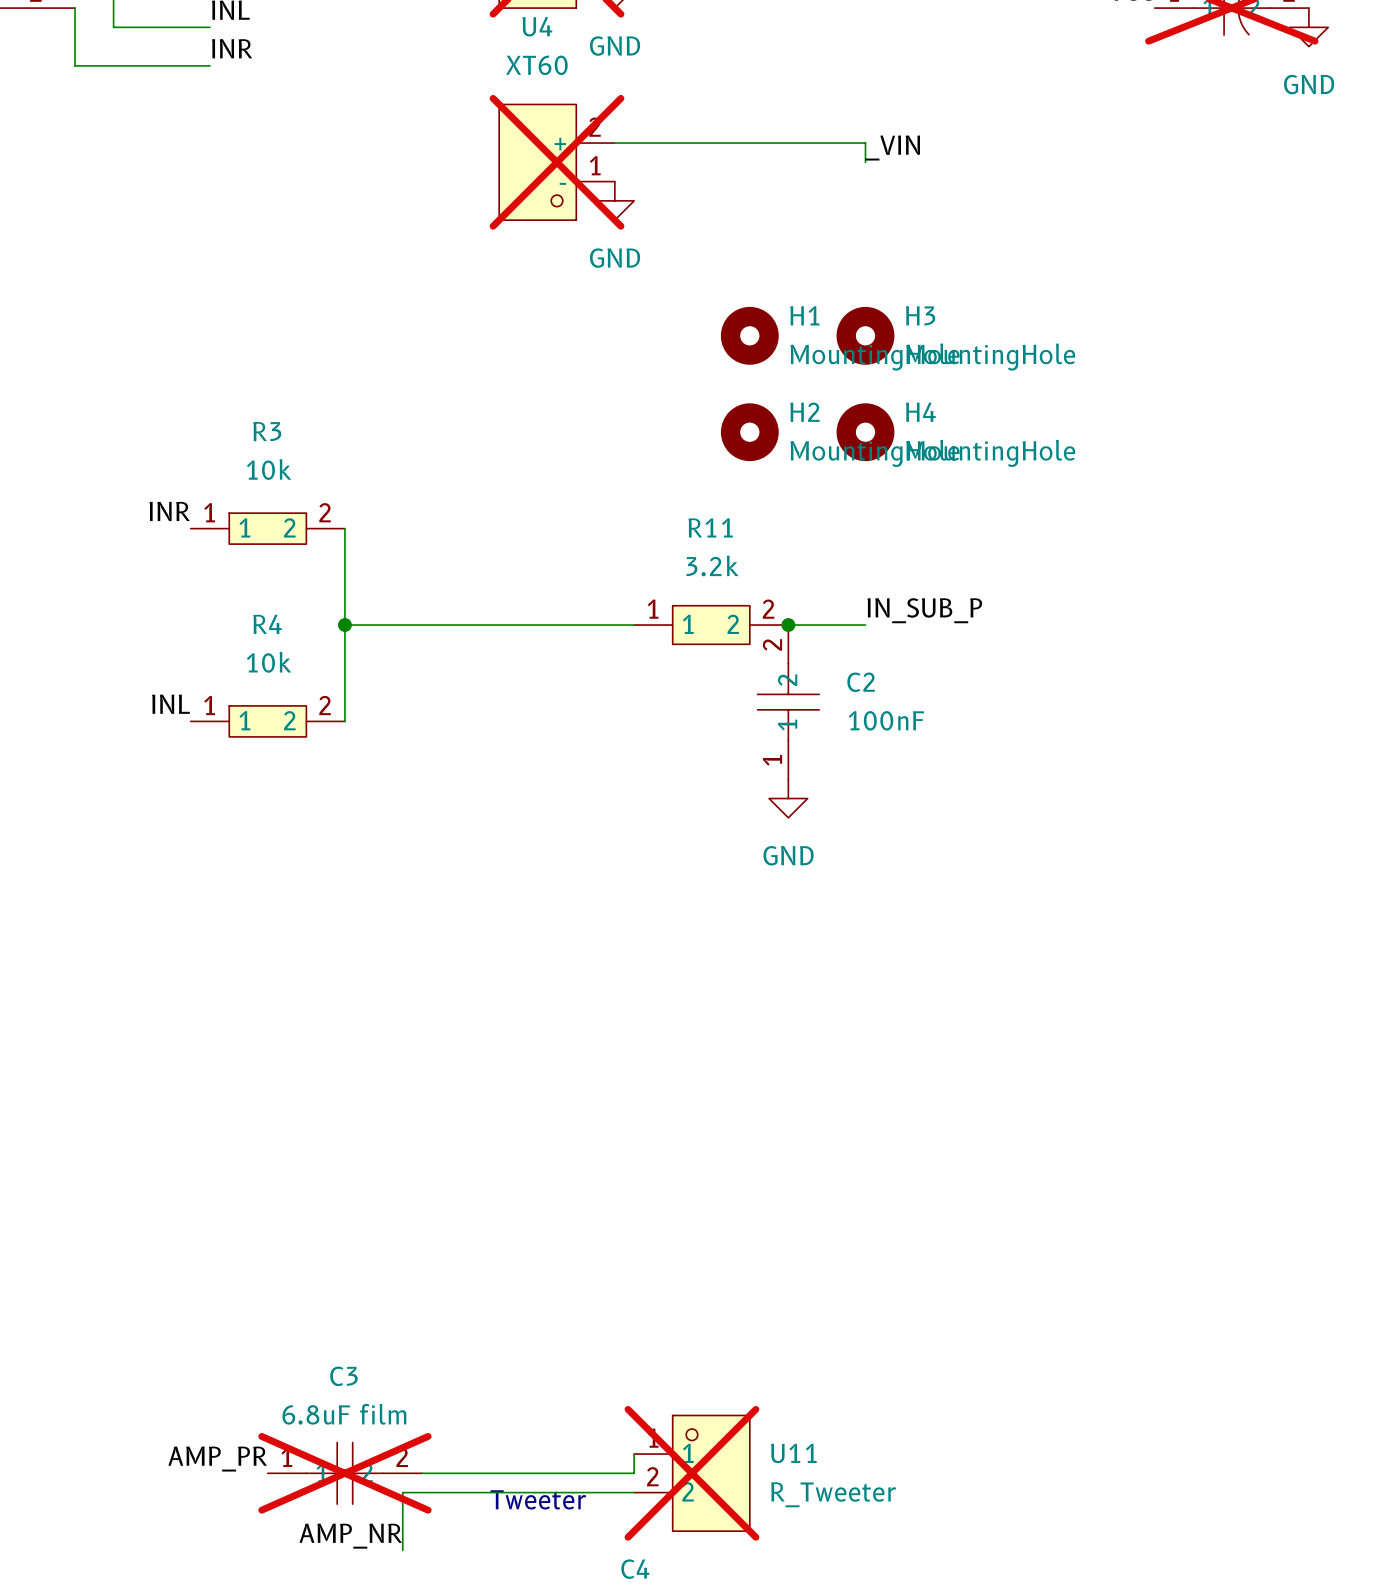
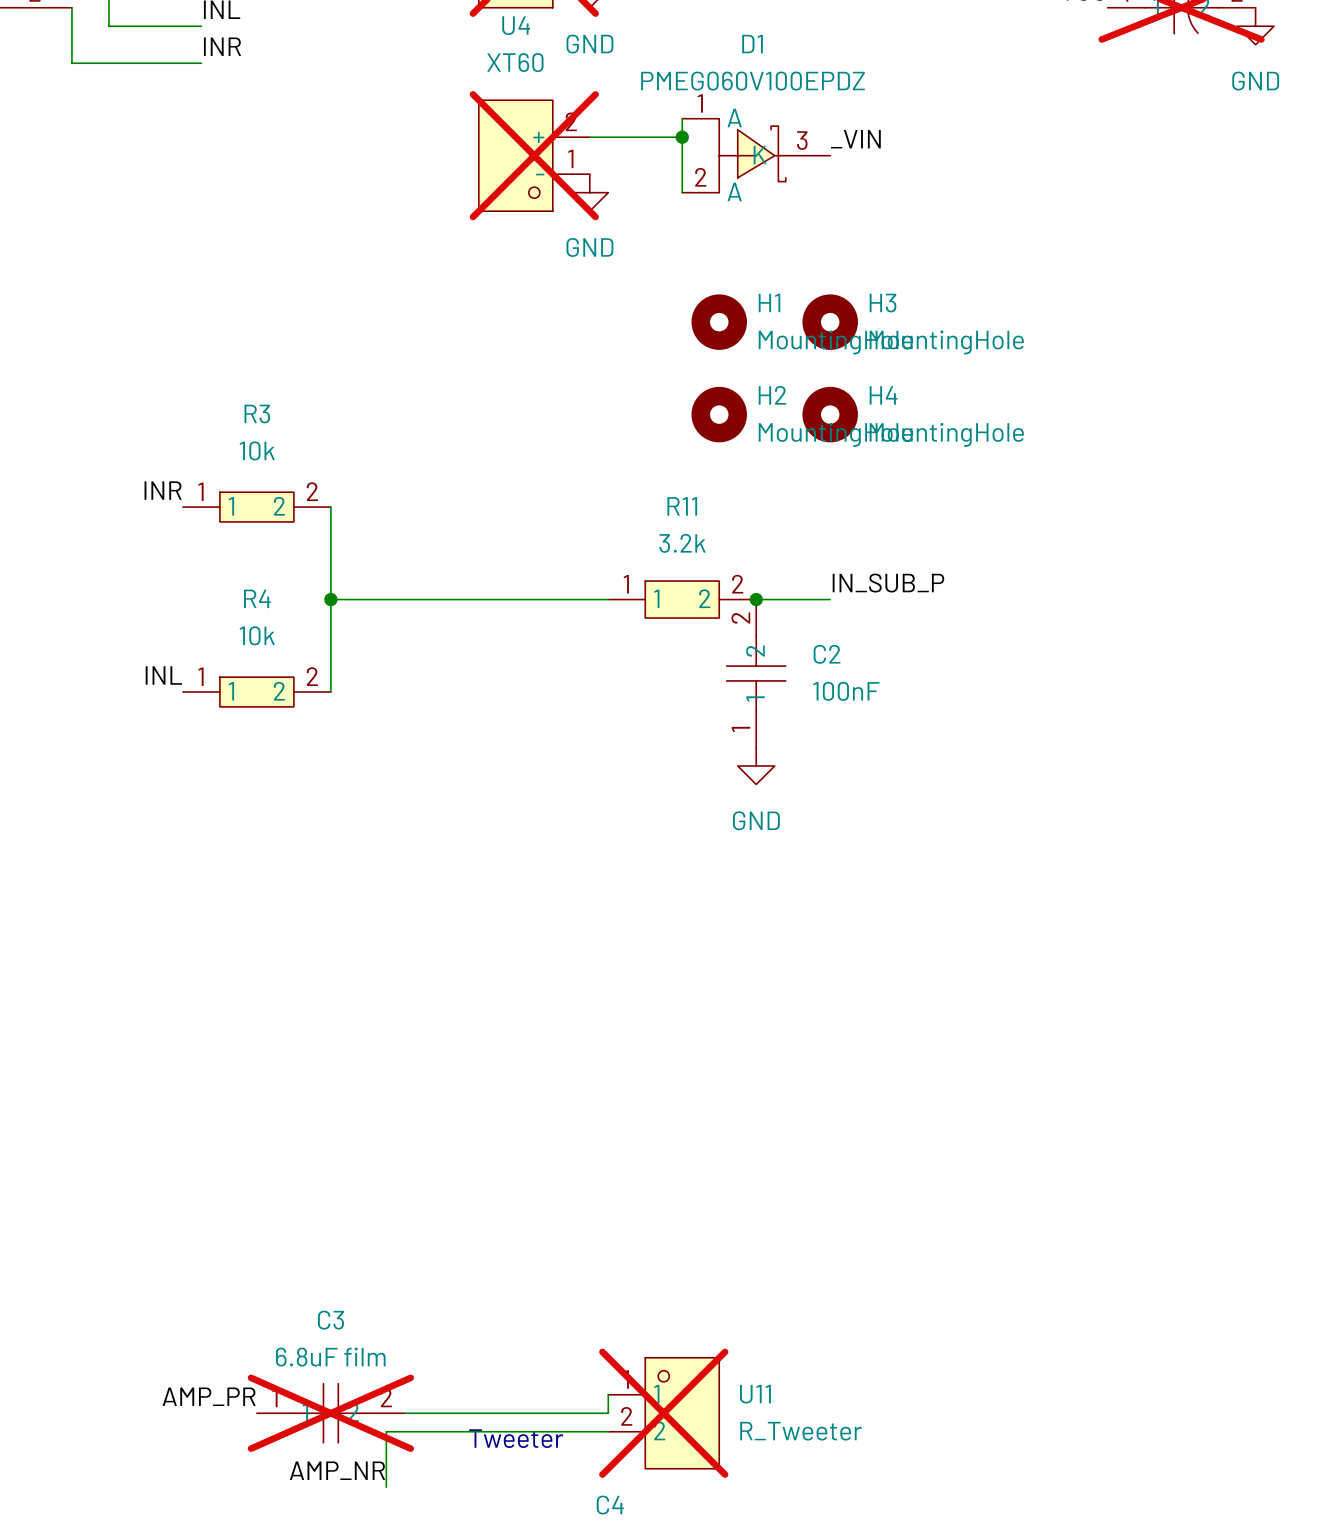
wire: none -> (682, 118) (682, 192)
wire: (711, 143) (865, 143) (865, 162) -> none
junction: none -> (682, 137)
D1: none -> PMEG060V100EPDZ (756, 155)

